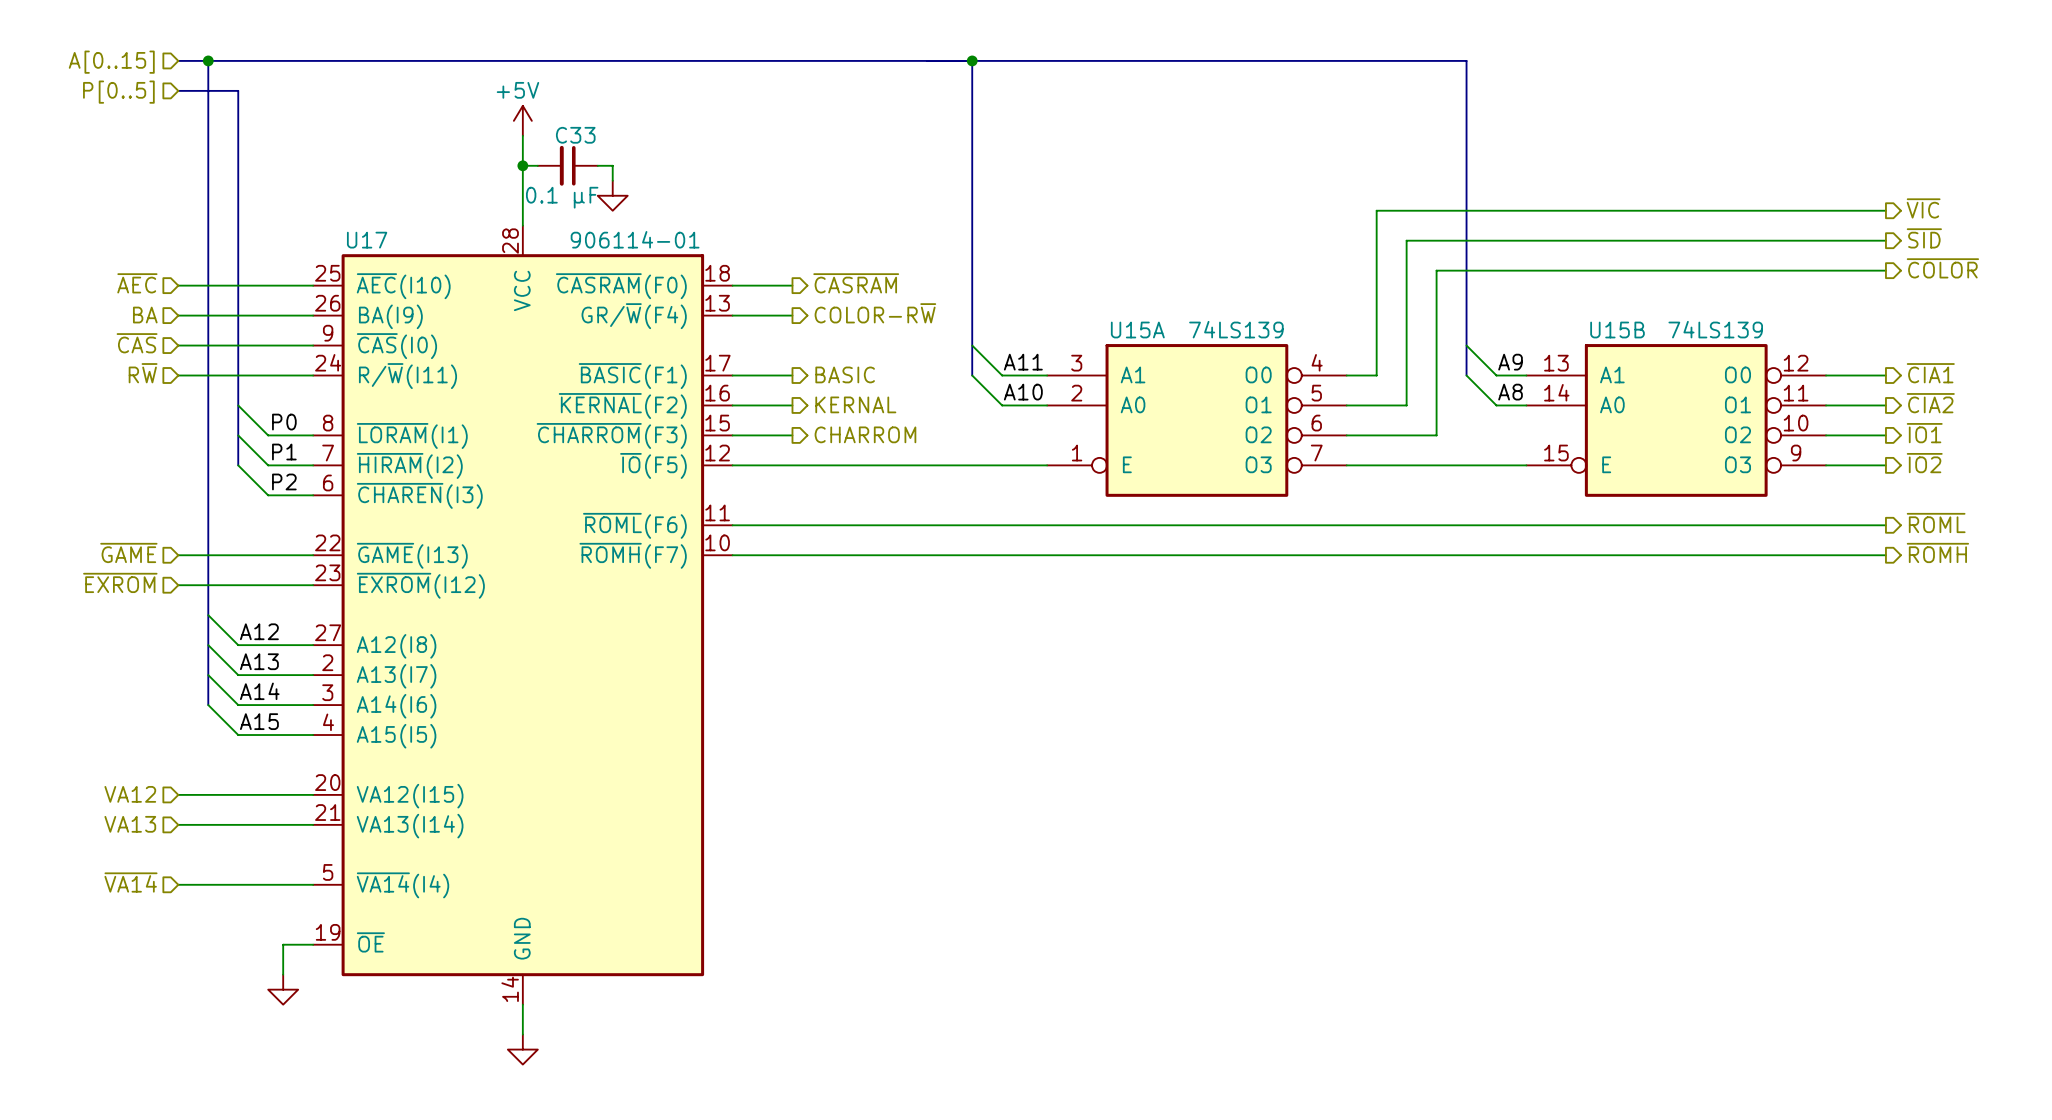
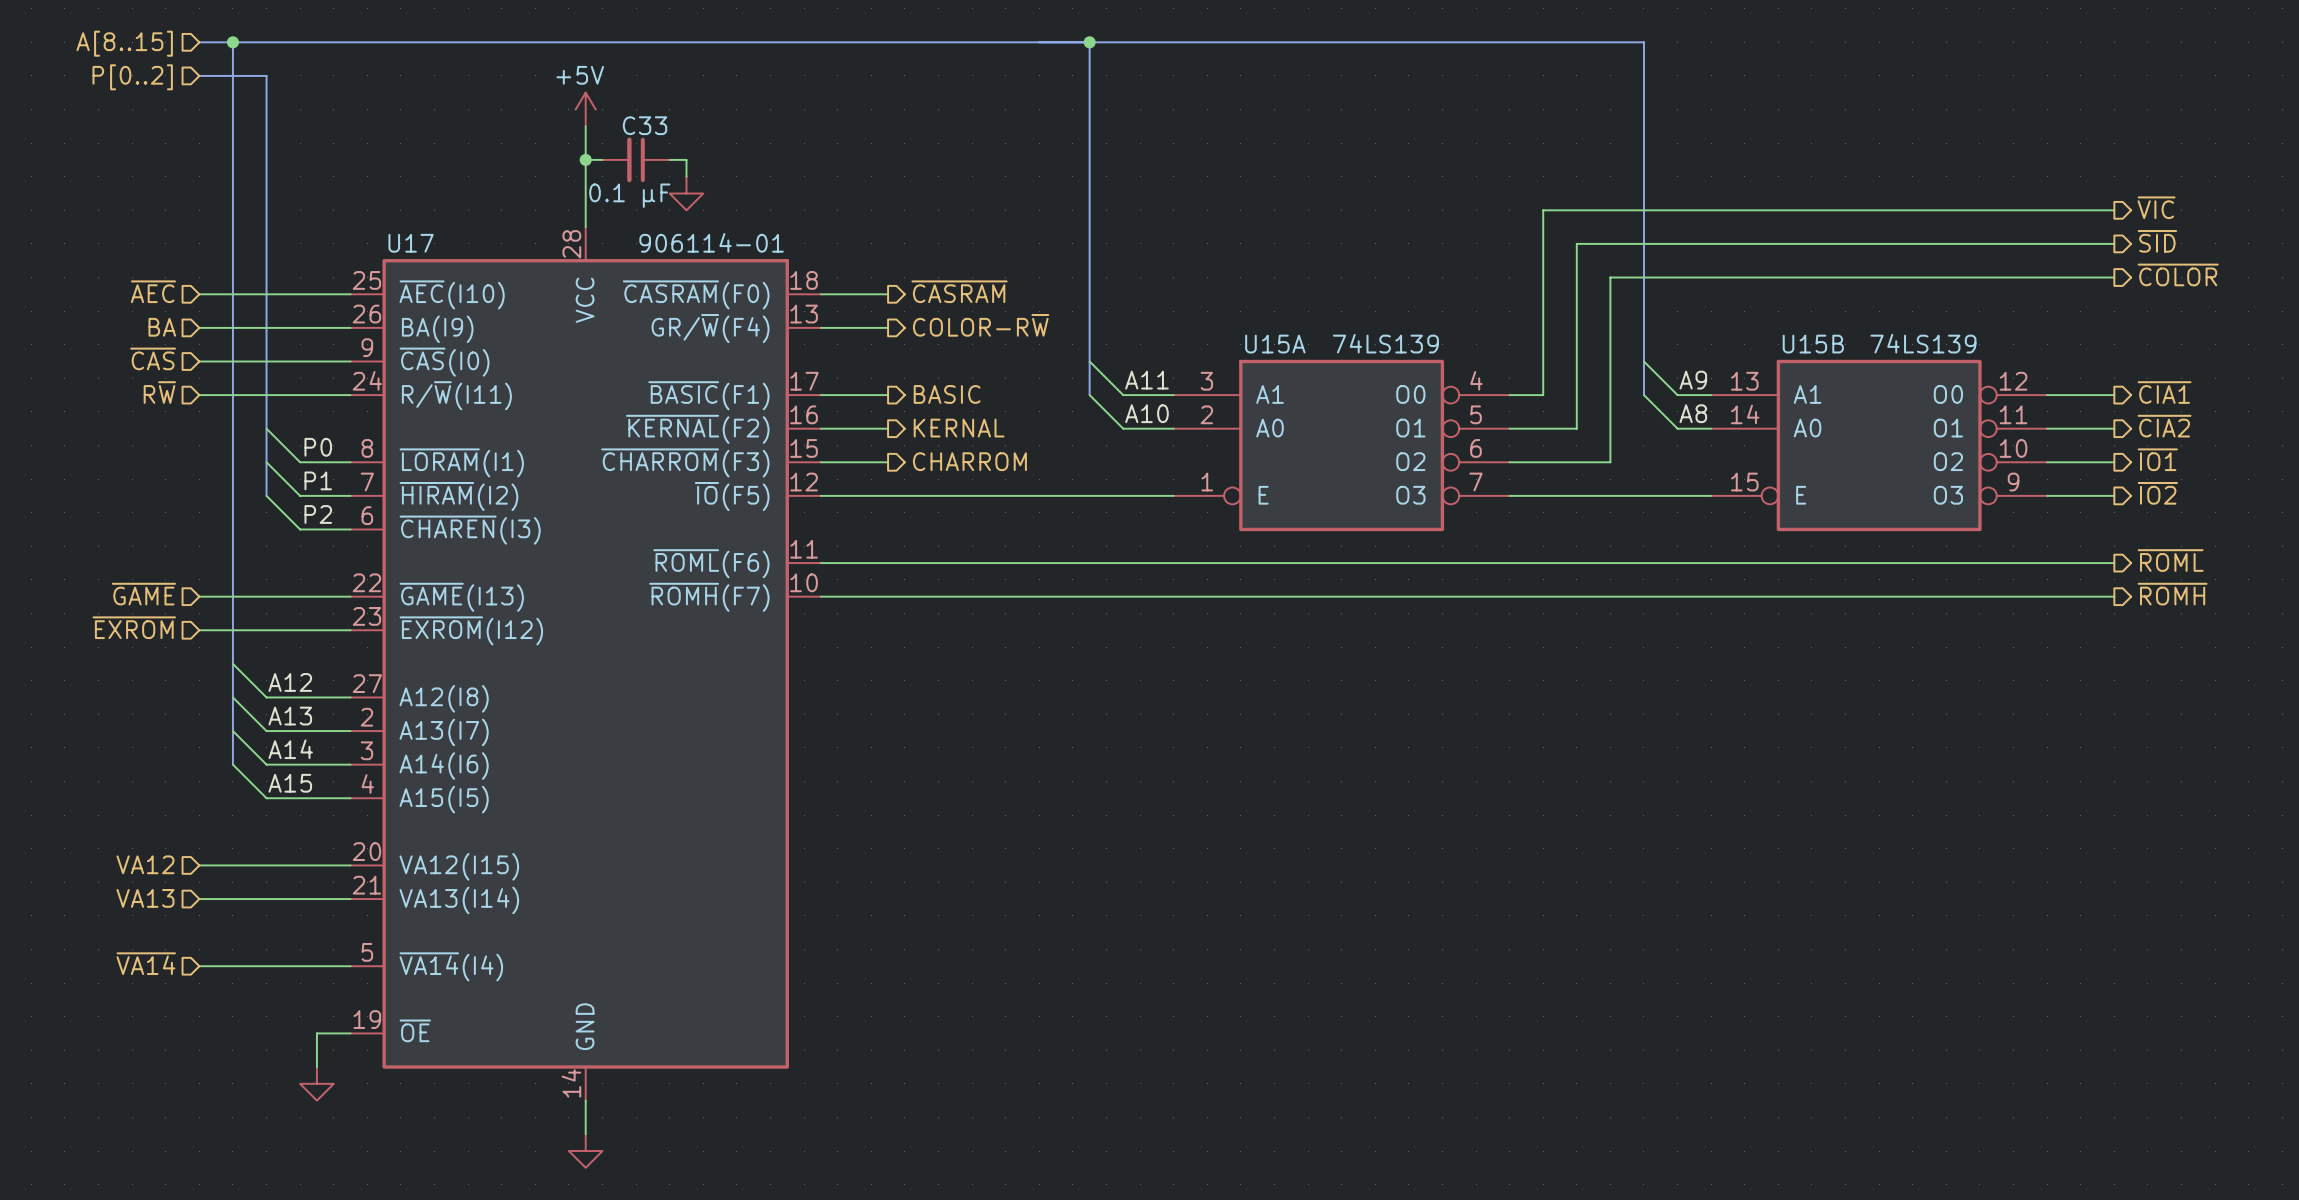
hierarchical label: A[0..15] (111, 62) -> A[8..15] (124, 43)
hierarchical label: P[0..5] (118, 92) -> P[0..2] (132, 77)

